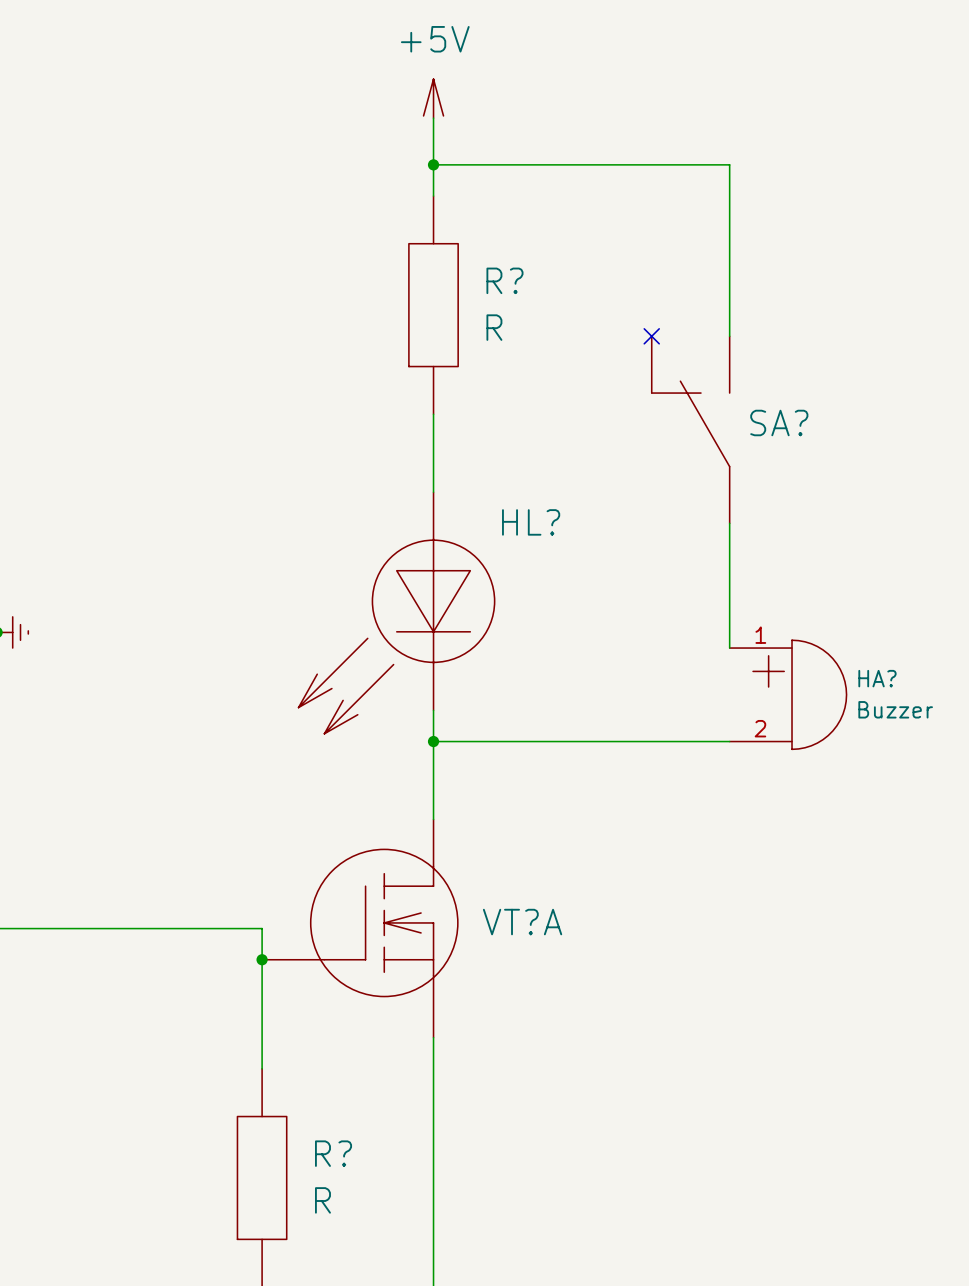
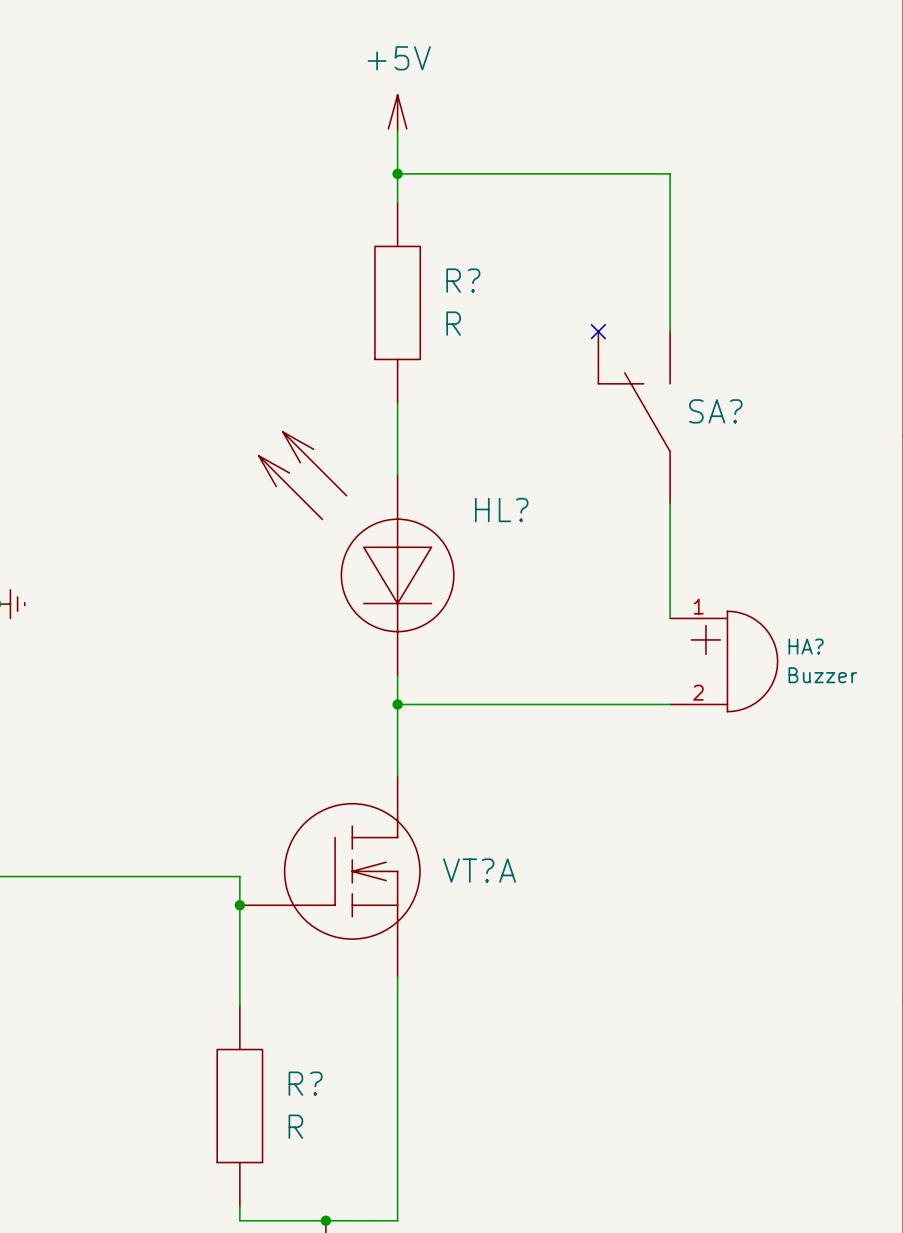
HL?: none -> (356, 553)
HL?: (396, 612) -> none

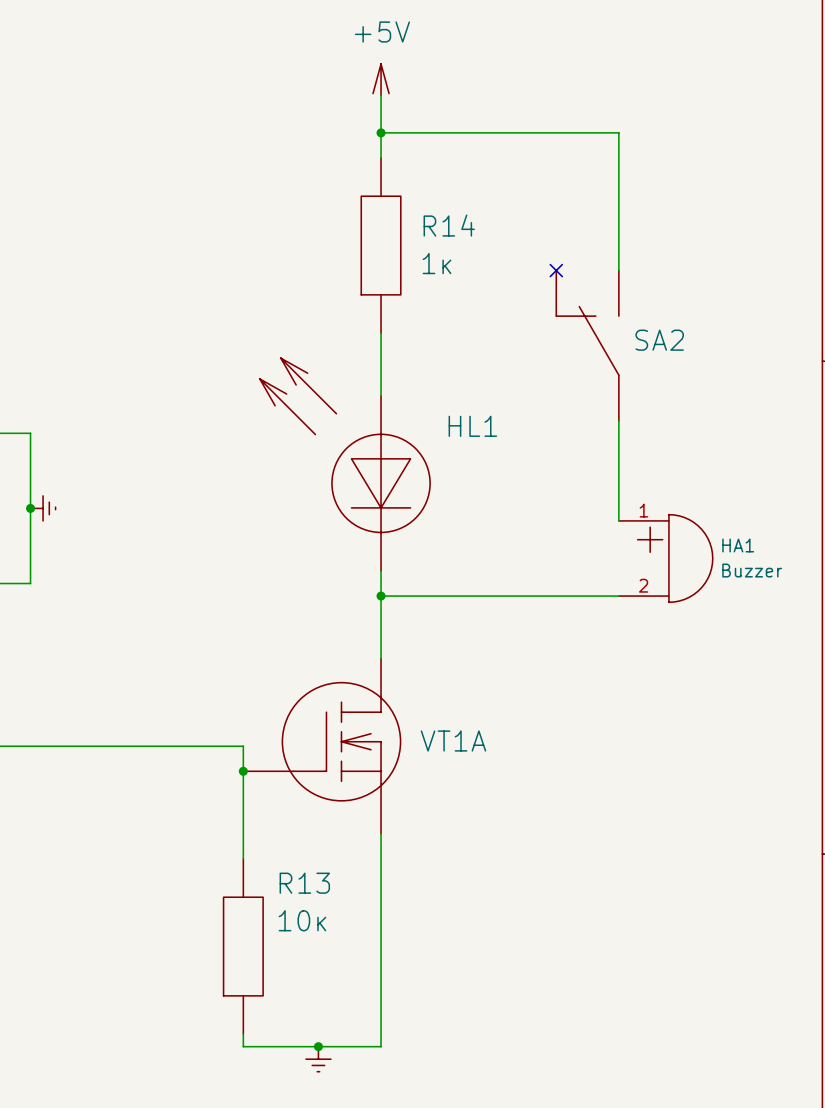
R? name: R? (463, 280) -> R14 (449, 225)
R? value: R (453, 323) -> 1к (436, 263)
SA? name: SA? (715, 411) -> SA2 (659, 340)
HL? name: HL? (501, 510) -> HL1 (472, 426)
HA? name: HA? (806, 646) -> HA1 (738, 545)
VT?A name: VT?A (479, 870) -> VT1A (453, 741)
R? name: R? (305, 1083) -> R13 (304, 883)
R? value: R (295, 1126) -> 10к (302, 920)

